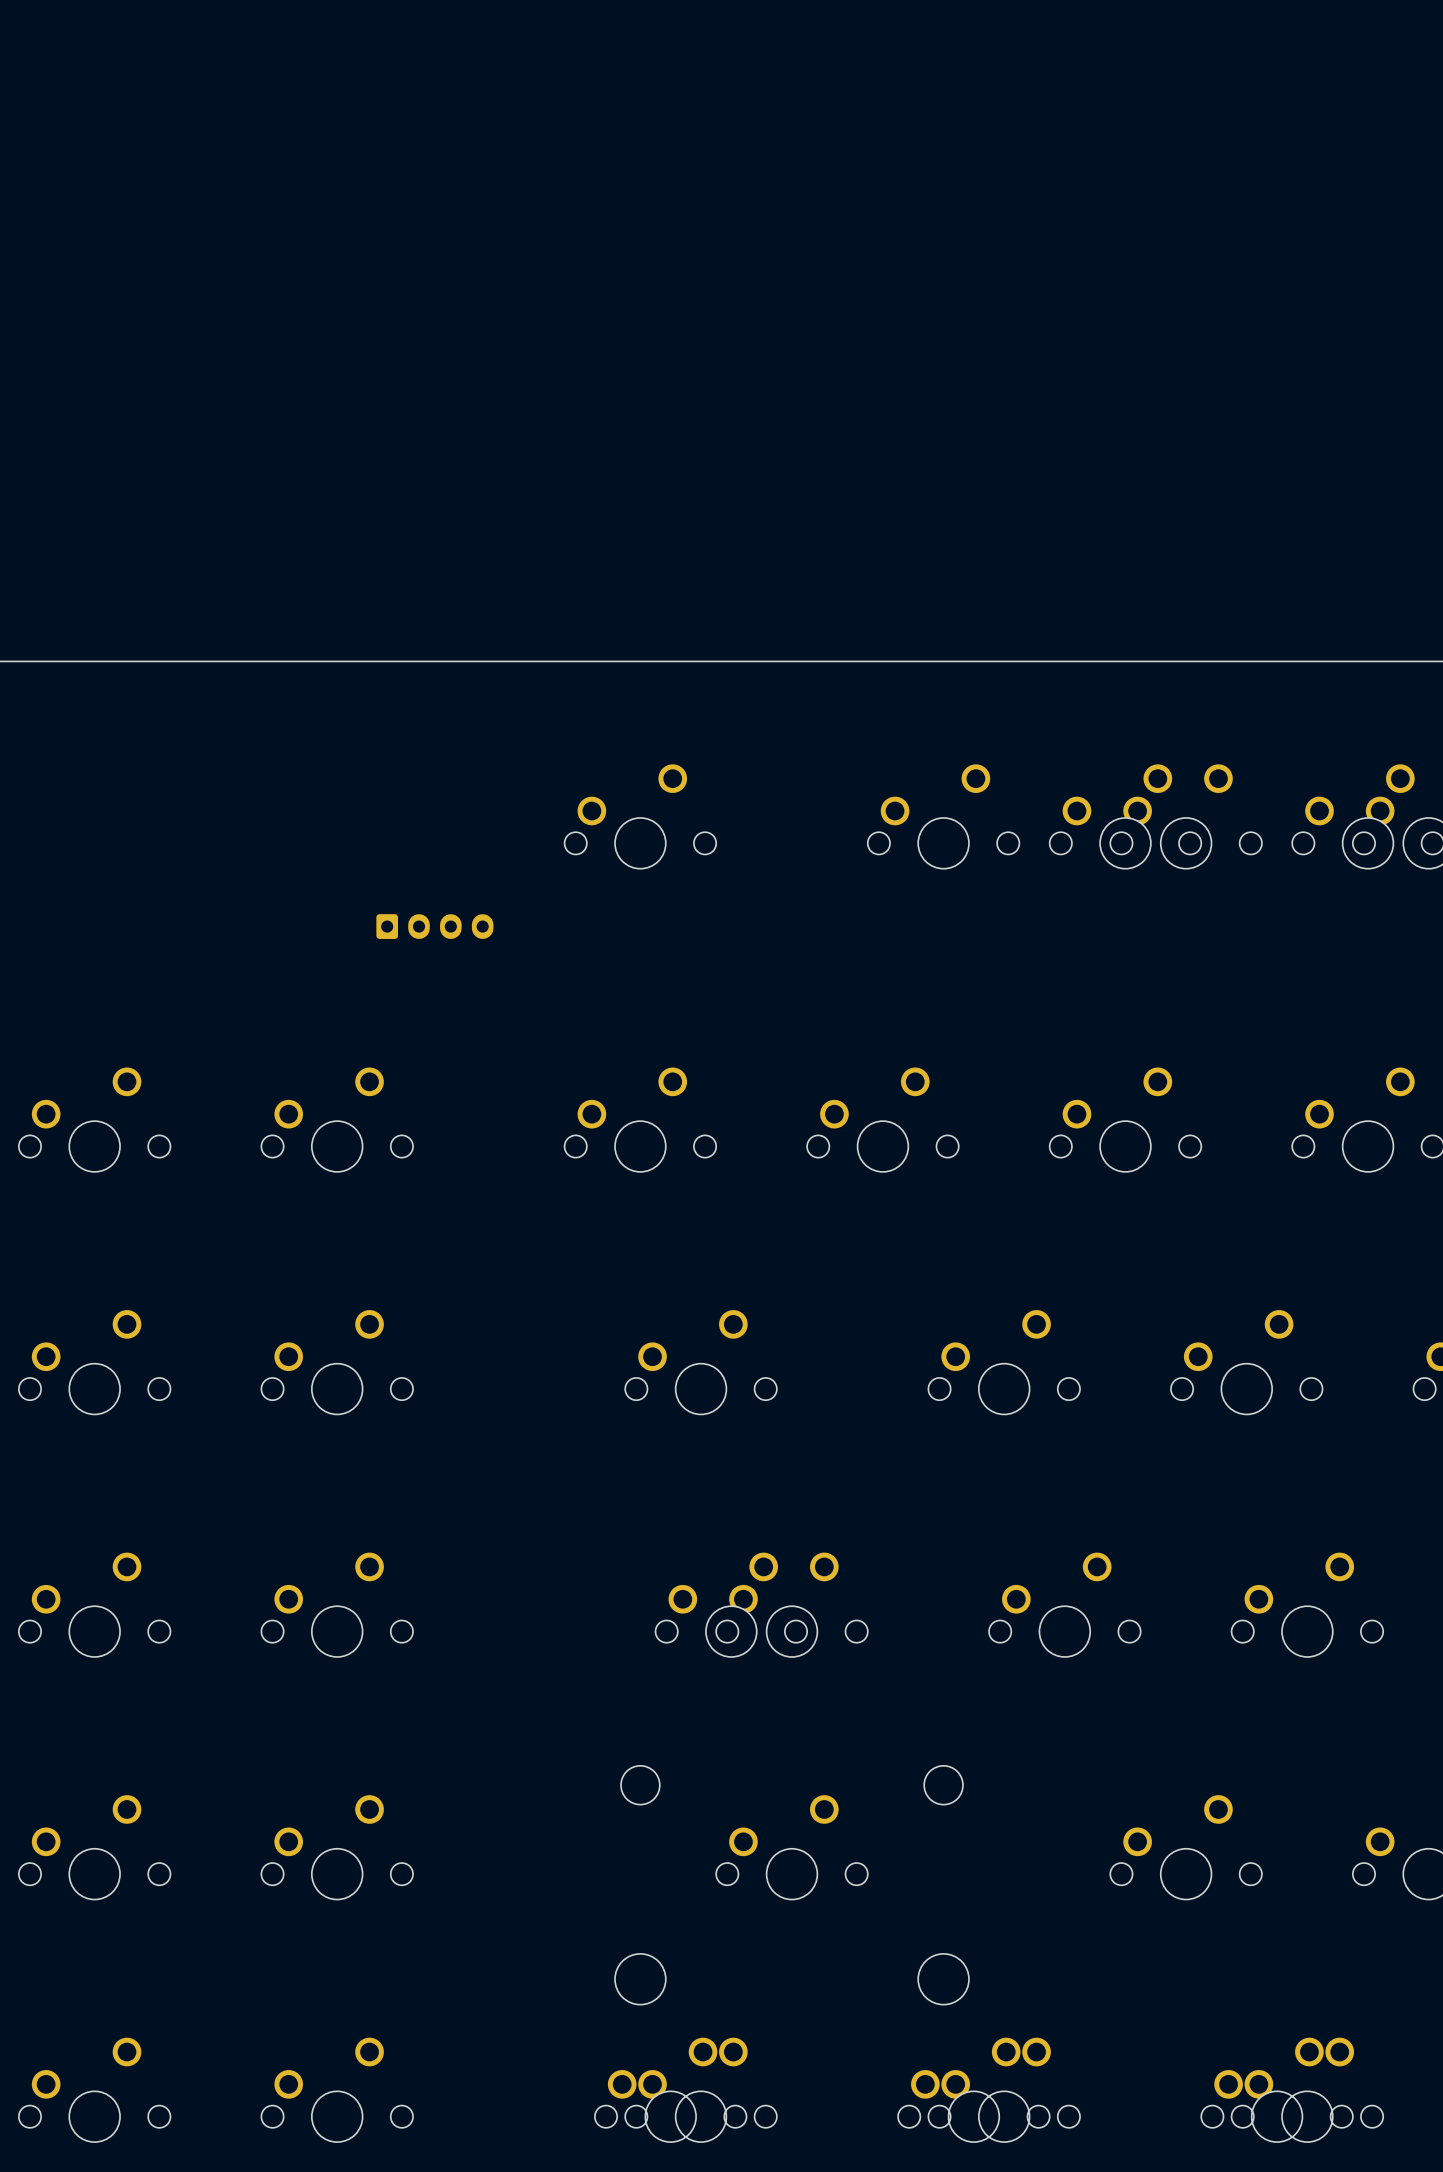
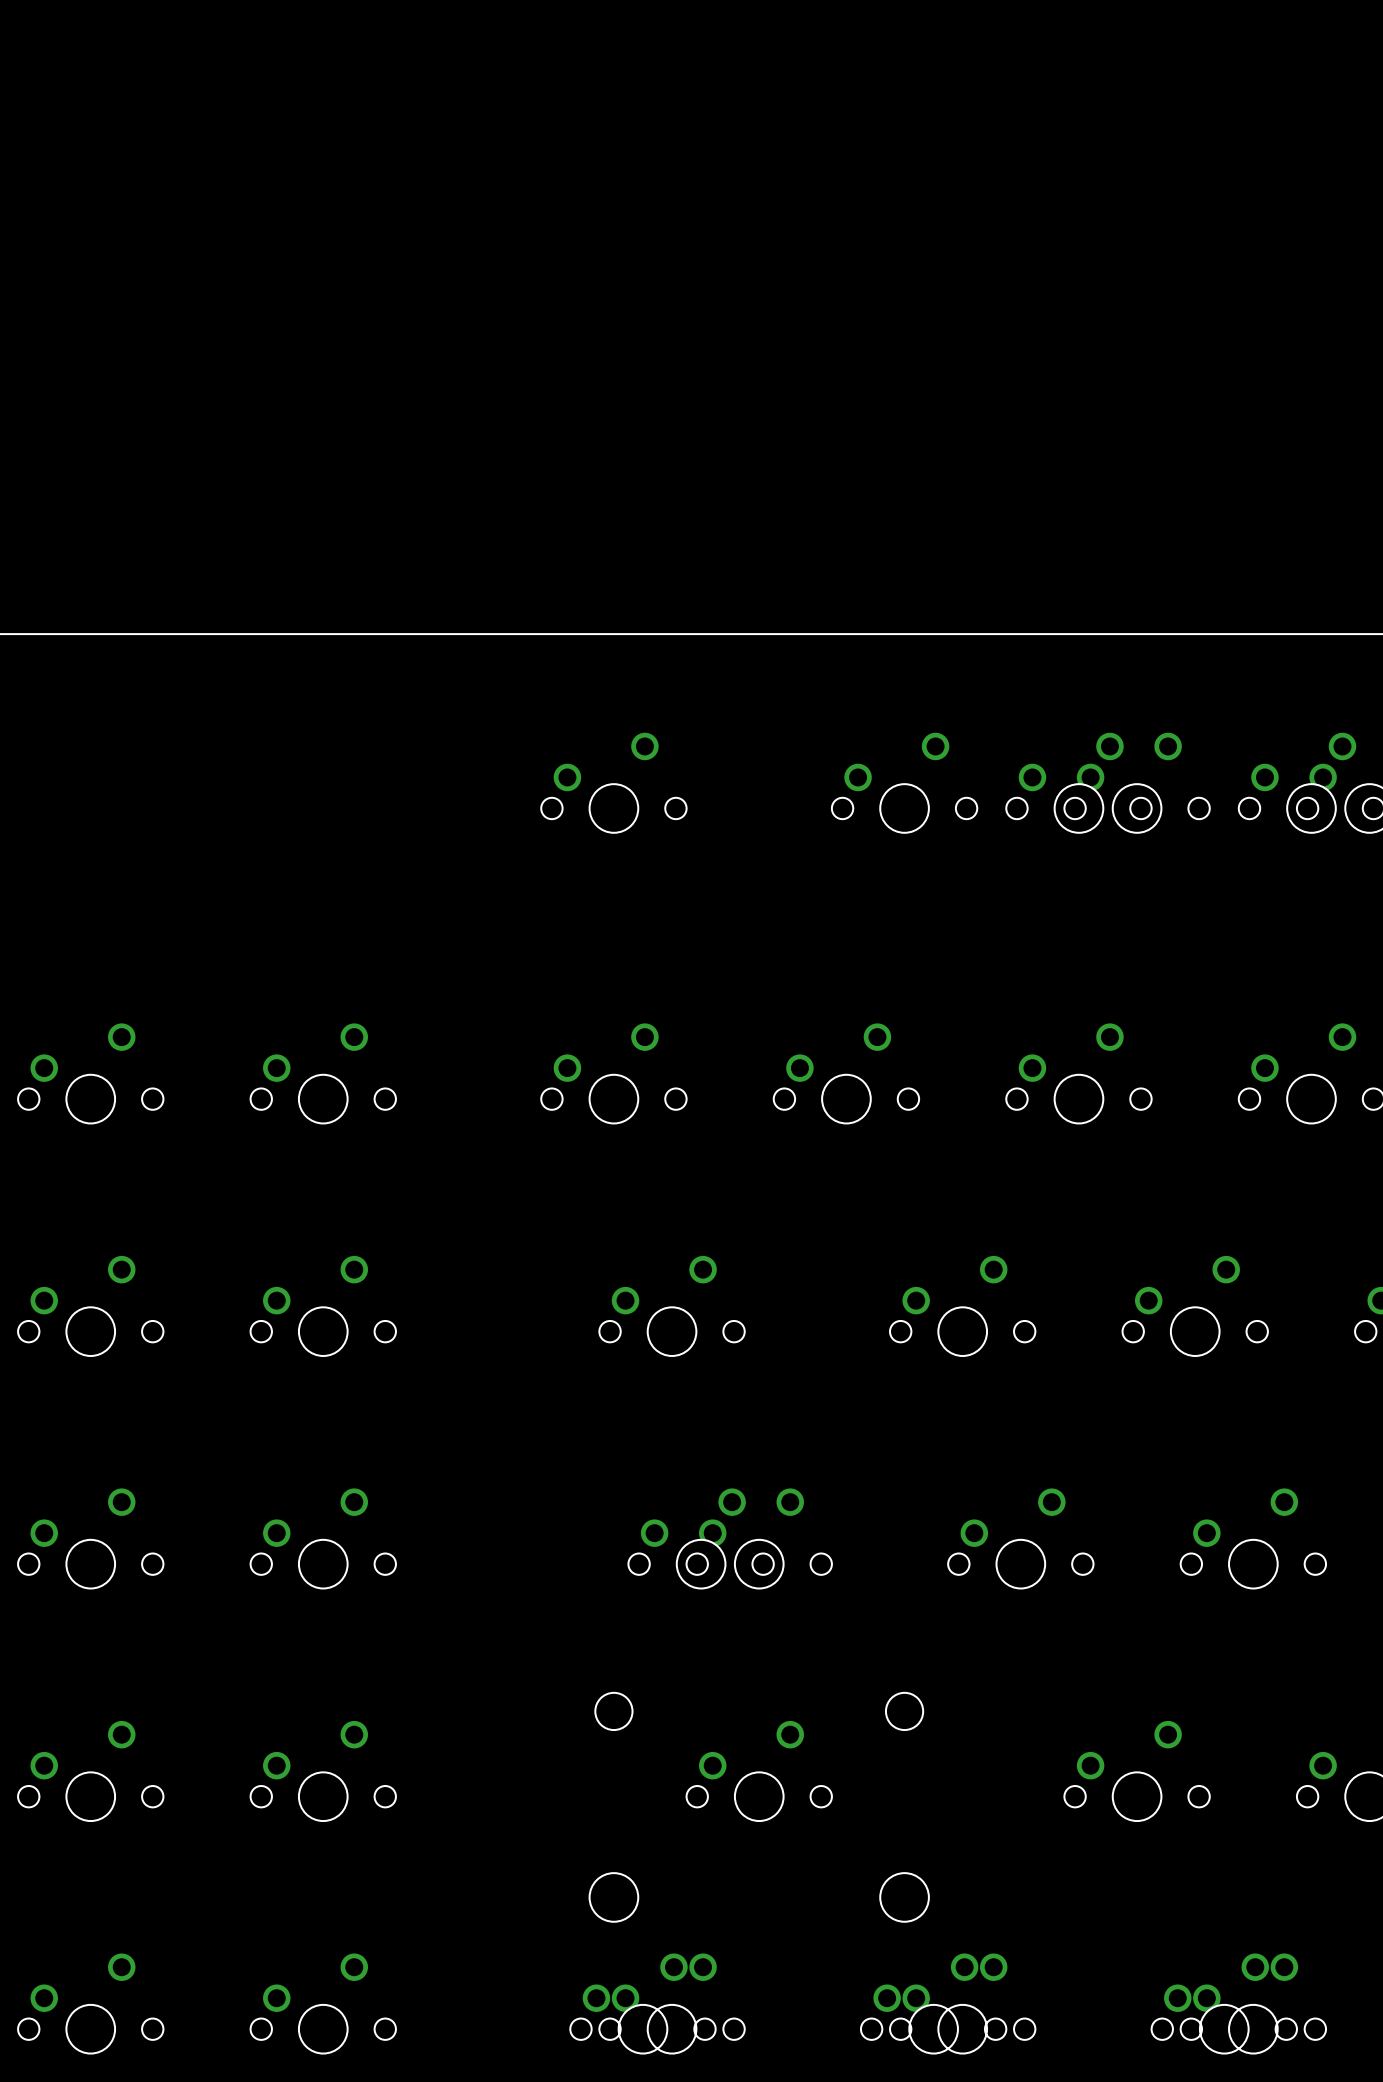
part: (434, 926) -> none

